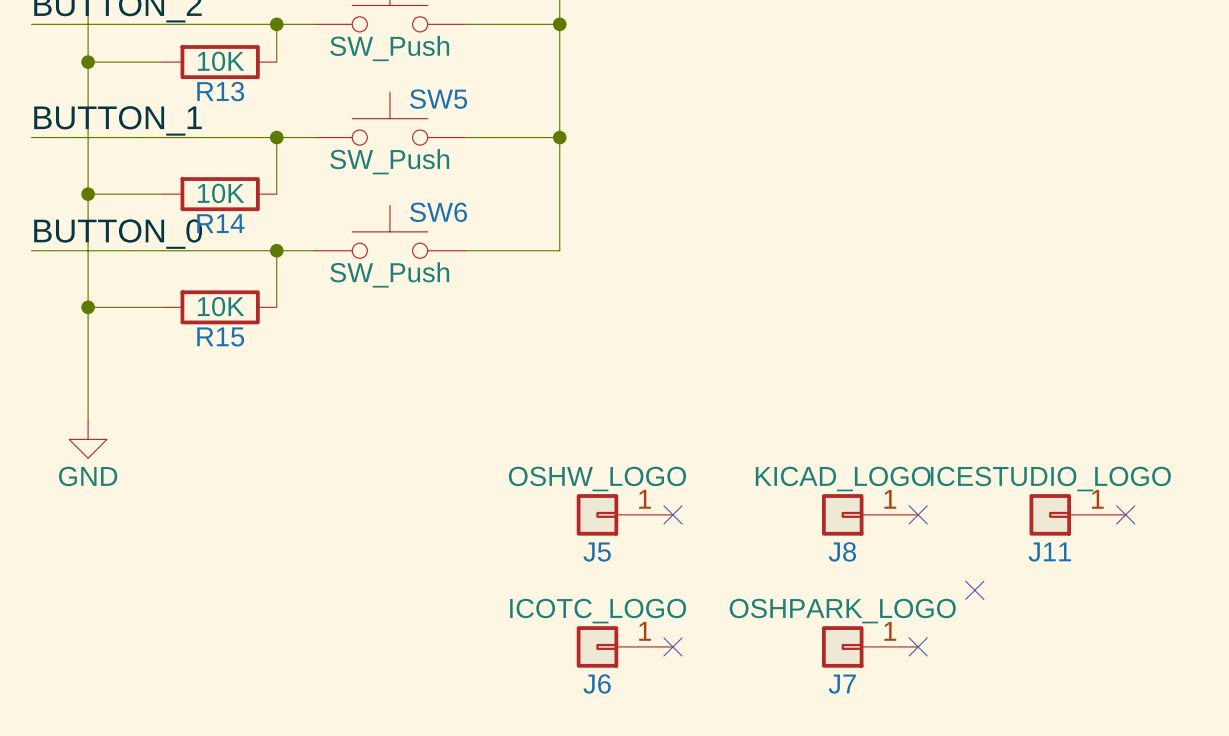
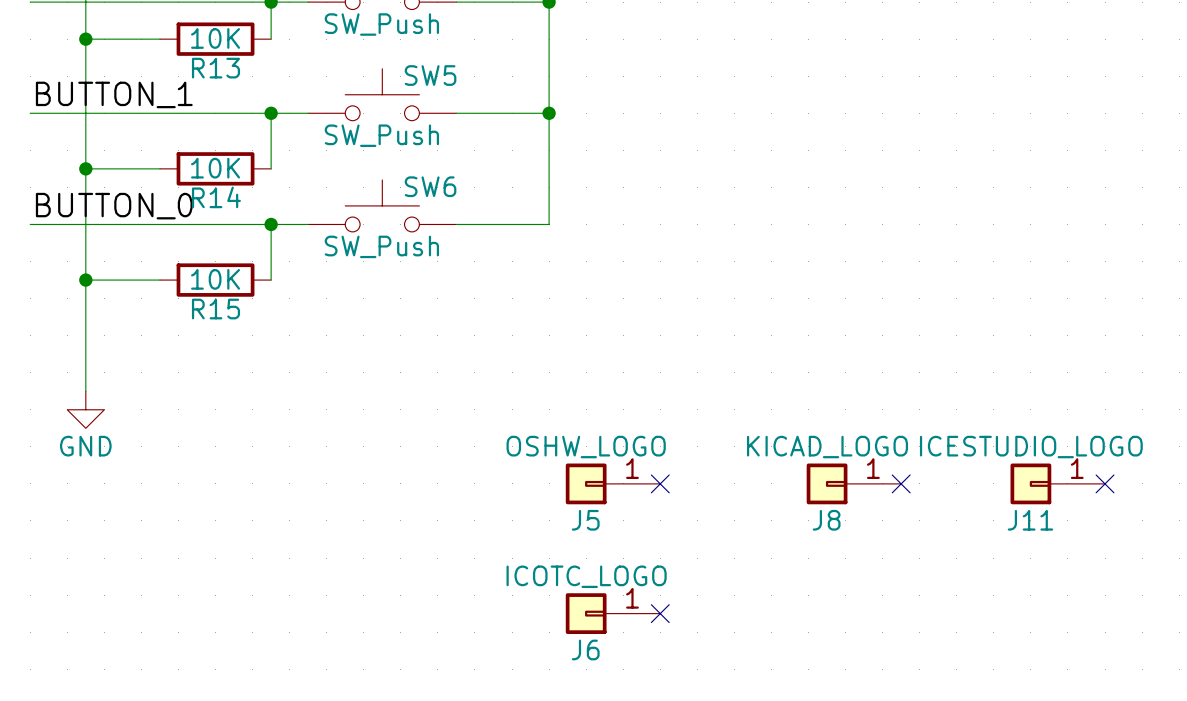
no-connect mark: (974, 590) -> none
J7: OSHPARK_LOGO (870, 646) -> none
no-connect mark: (918, 646) -> none

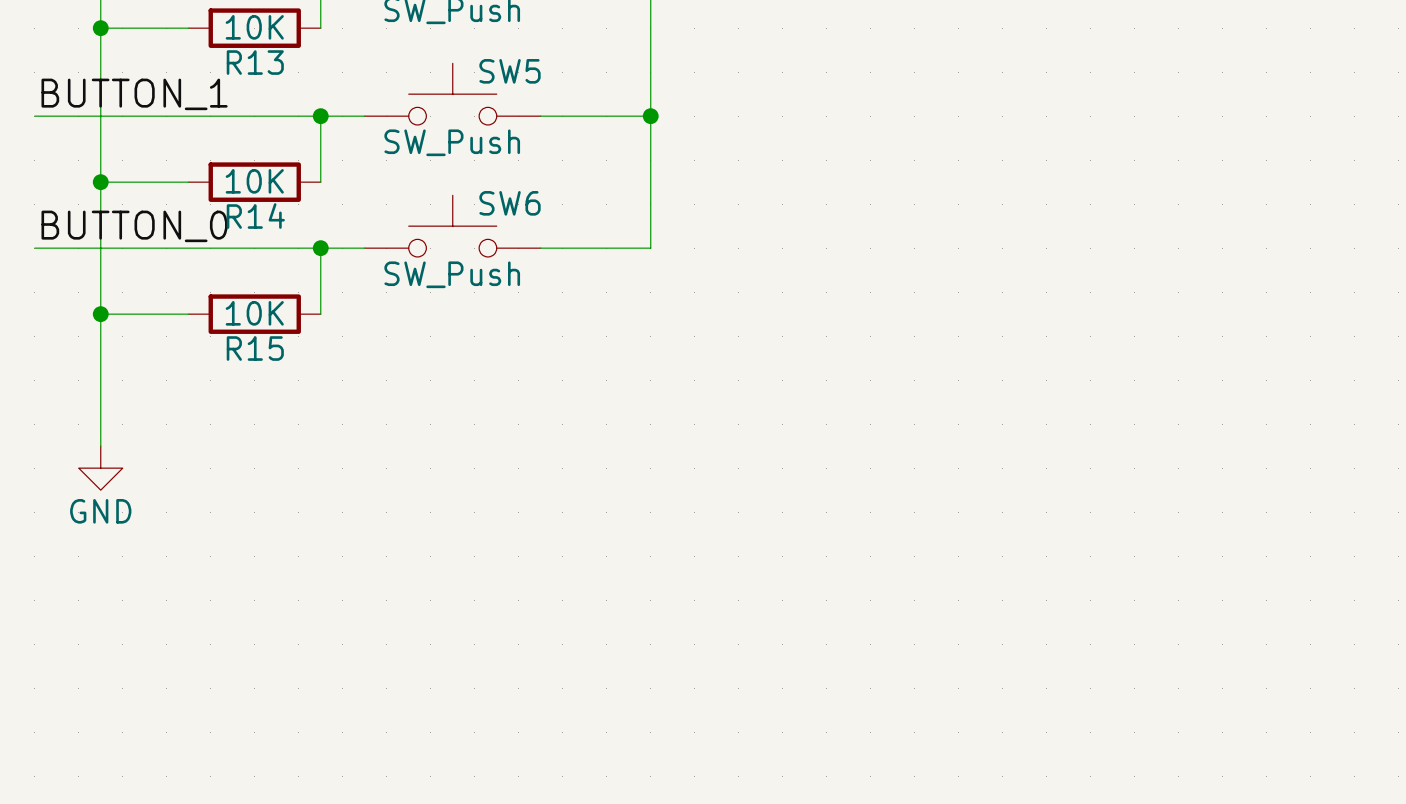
J5: OSHW_LOGO (613, 483) -> none
no-connect mark: (660, 483) -> none
J8: KICAD_LOGO (853, 483) -> none
no-connect mark: (901, 483) -> none
J11: ICESTUDIO_LOGO (1057, 483) -> none
no-connect mark: (1105, 483) -> none
J6: ICOTC_LOGO (613, 613) -> none
no-connect mark: (660, 613) -> none

